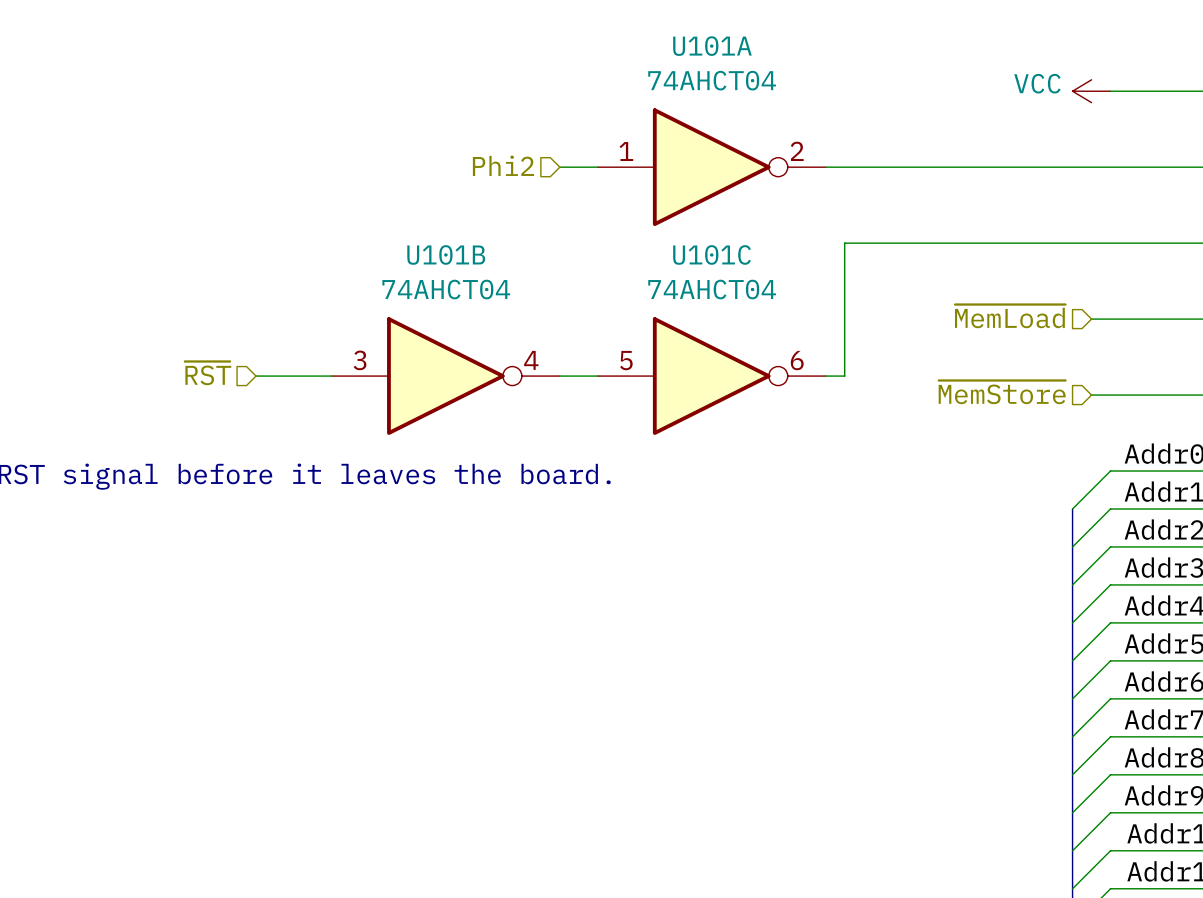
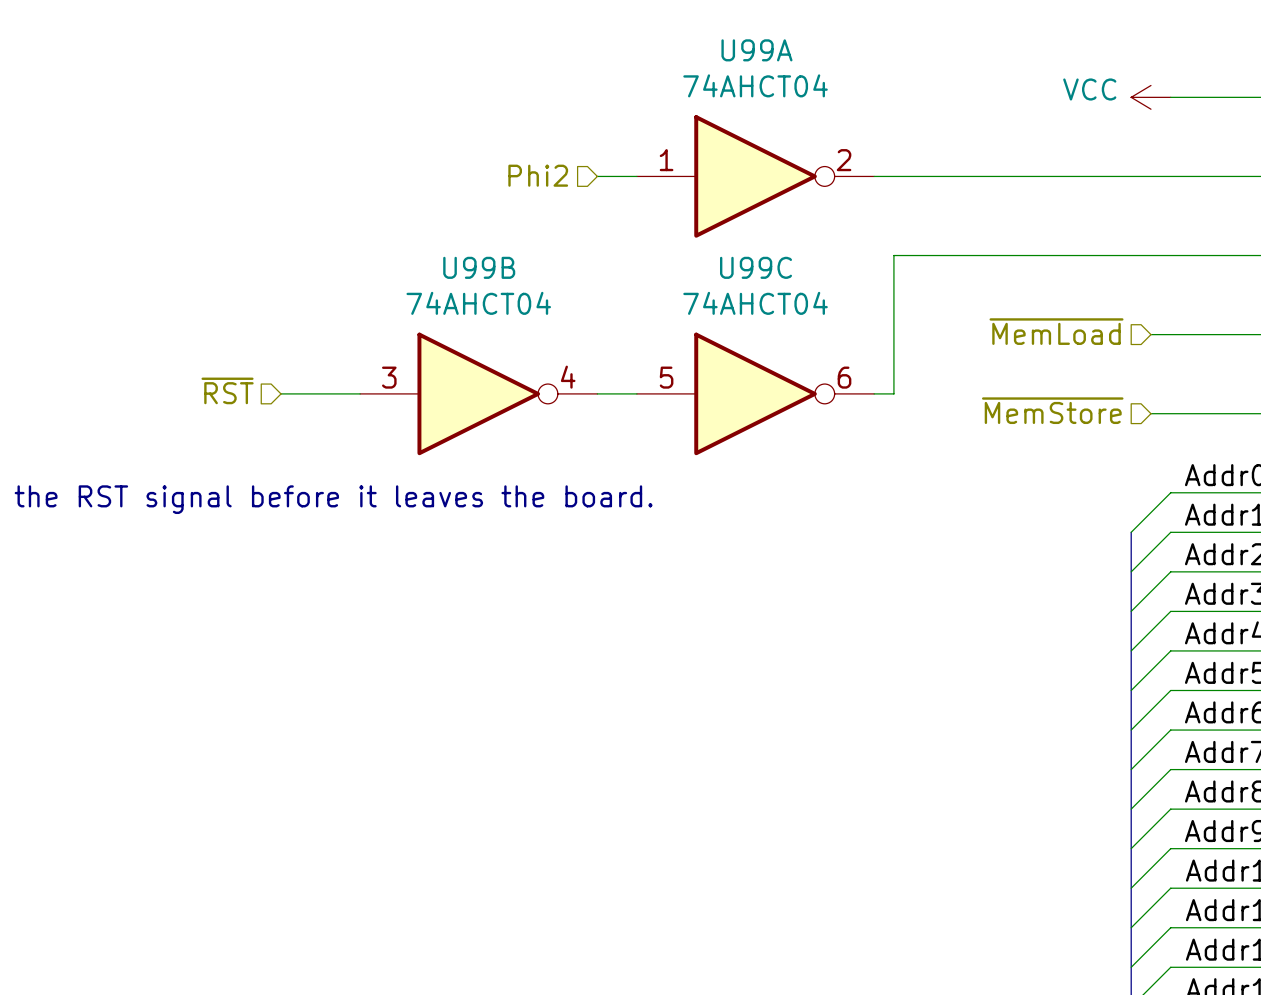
U101A name: U101A (712, 46) -> U99A (756, 50)
U101B name: U101B (446, 254) -> U99B (479, 267)
U101C name: U101C (712, 254) -> U99C (756, 267)

